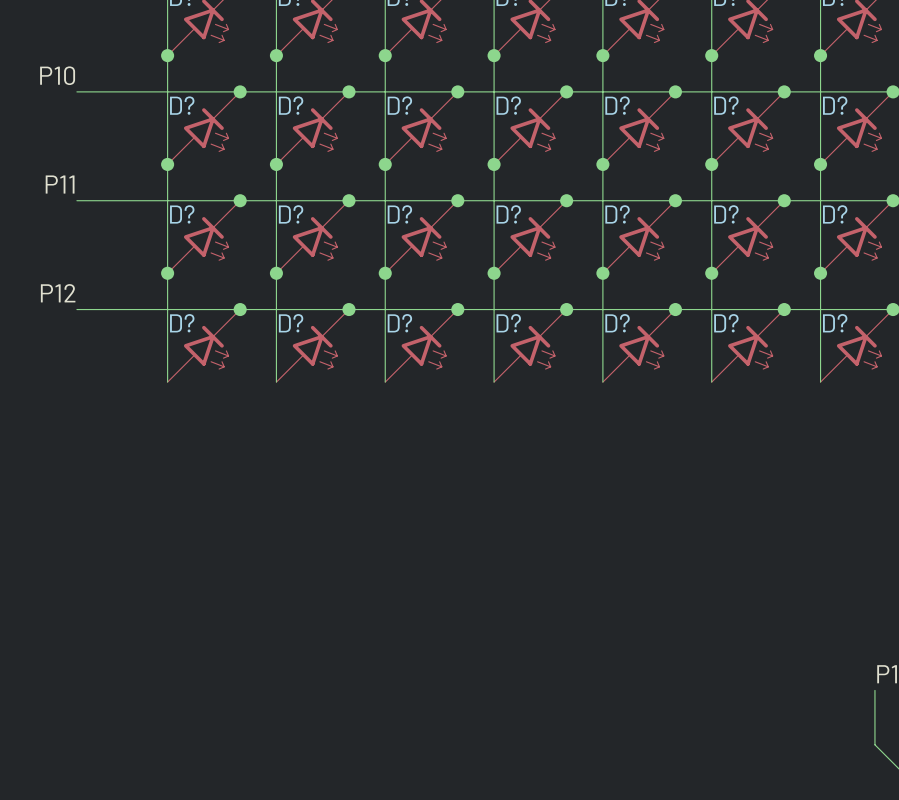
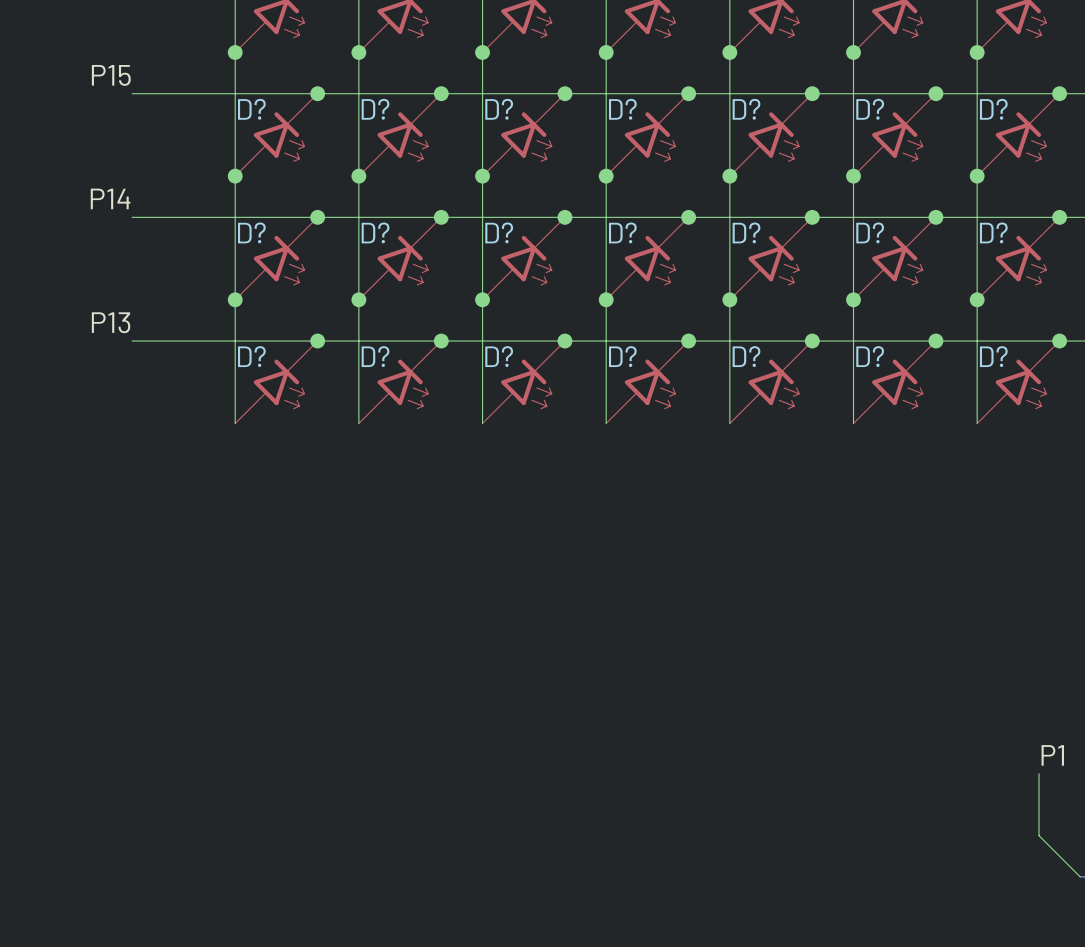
label: P10 (57, 75) -> P15 (111, 75)
label: P11 (60, 184) -> P14 (110, 198)
label: P12 (58, 293) -> P13 (111, 322)

